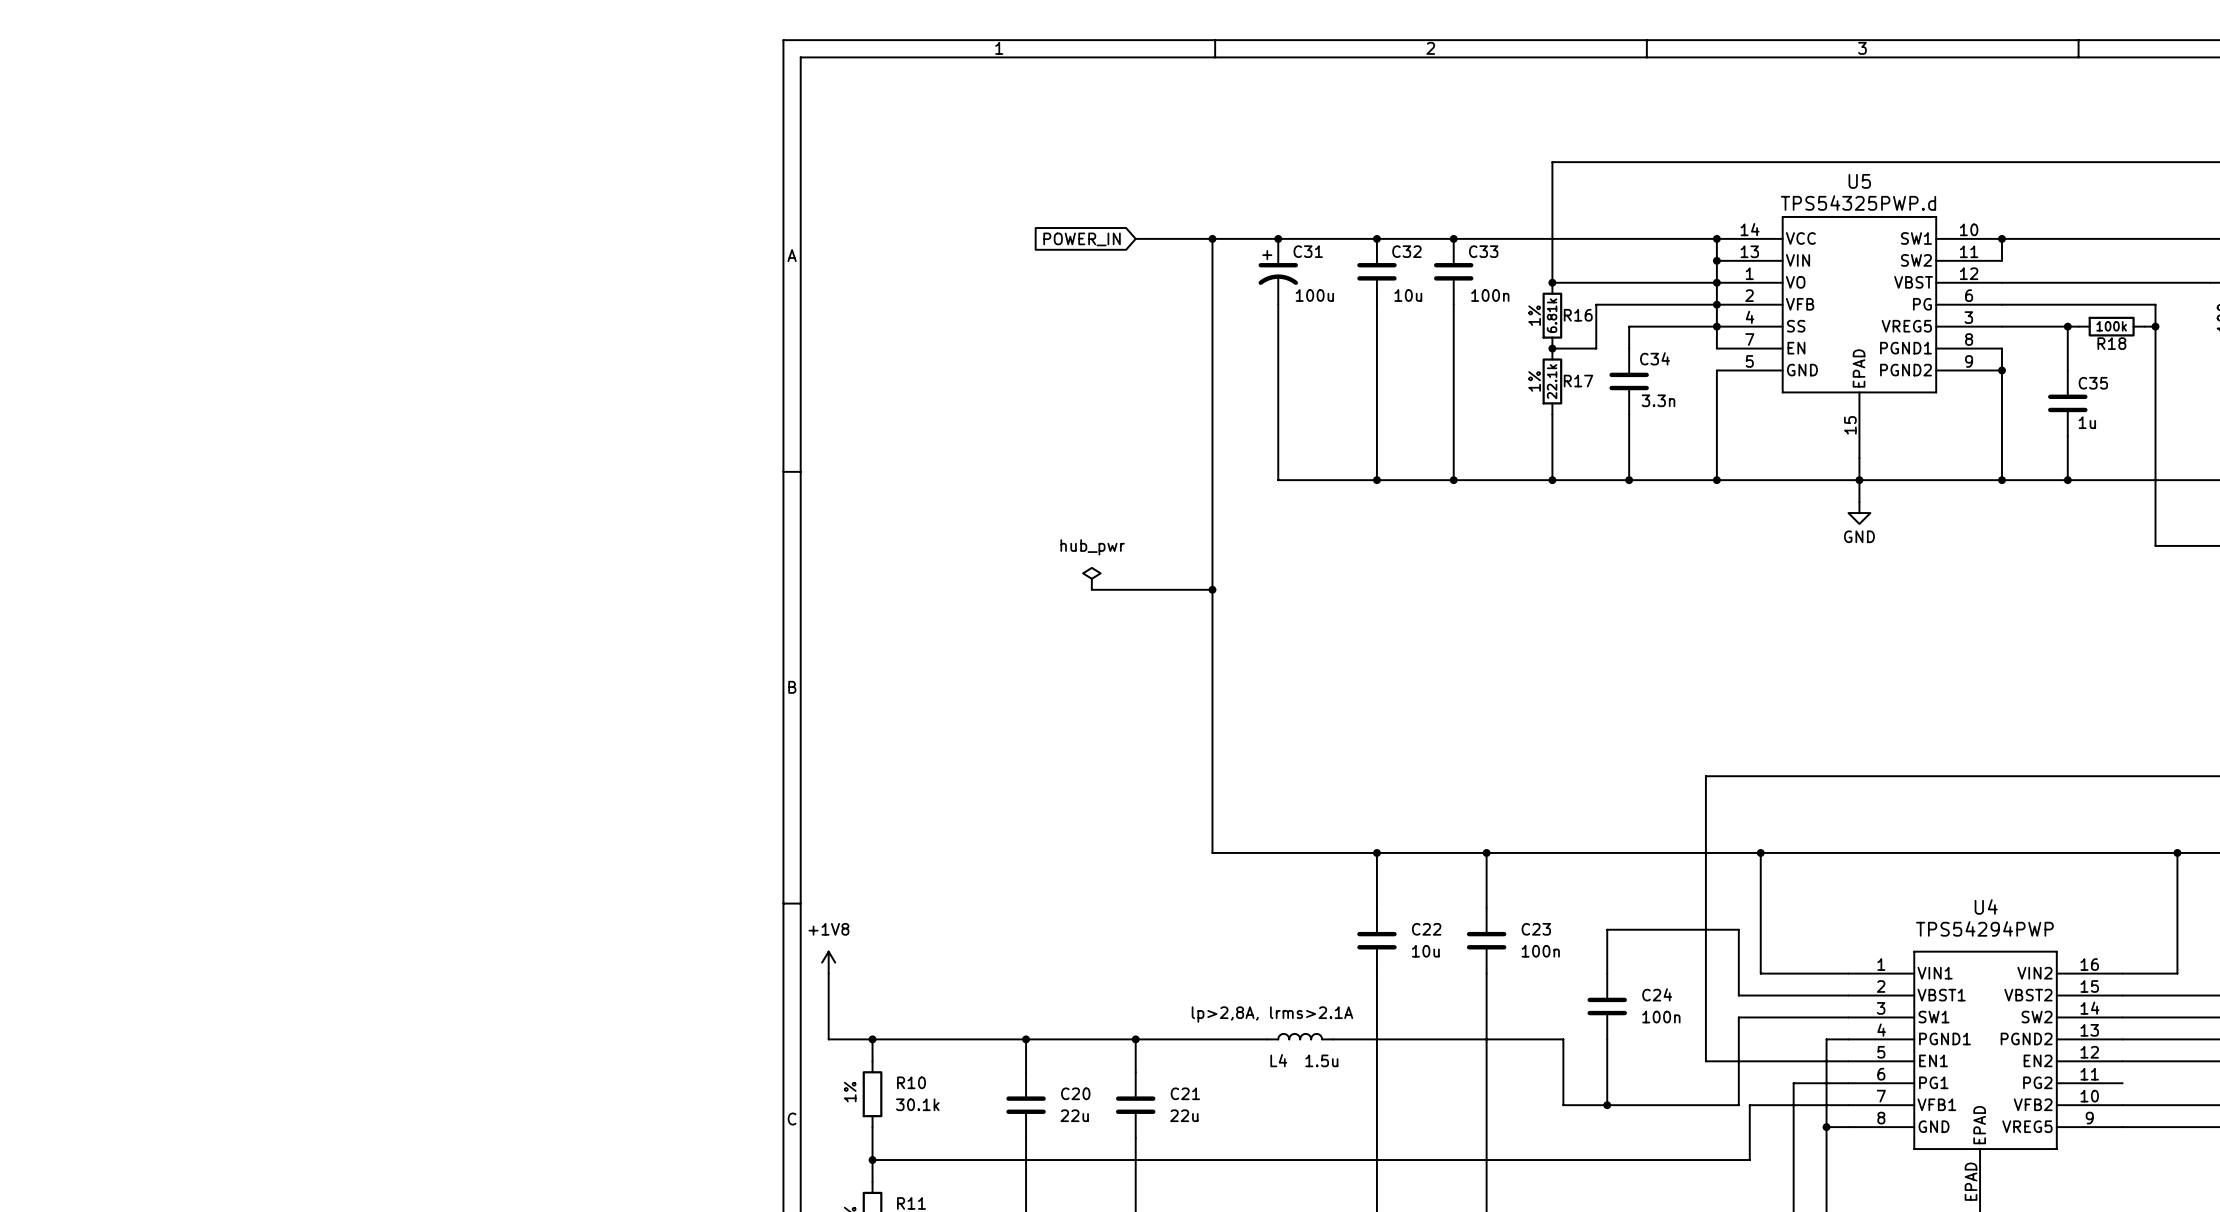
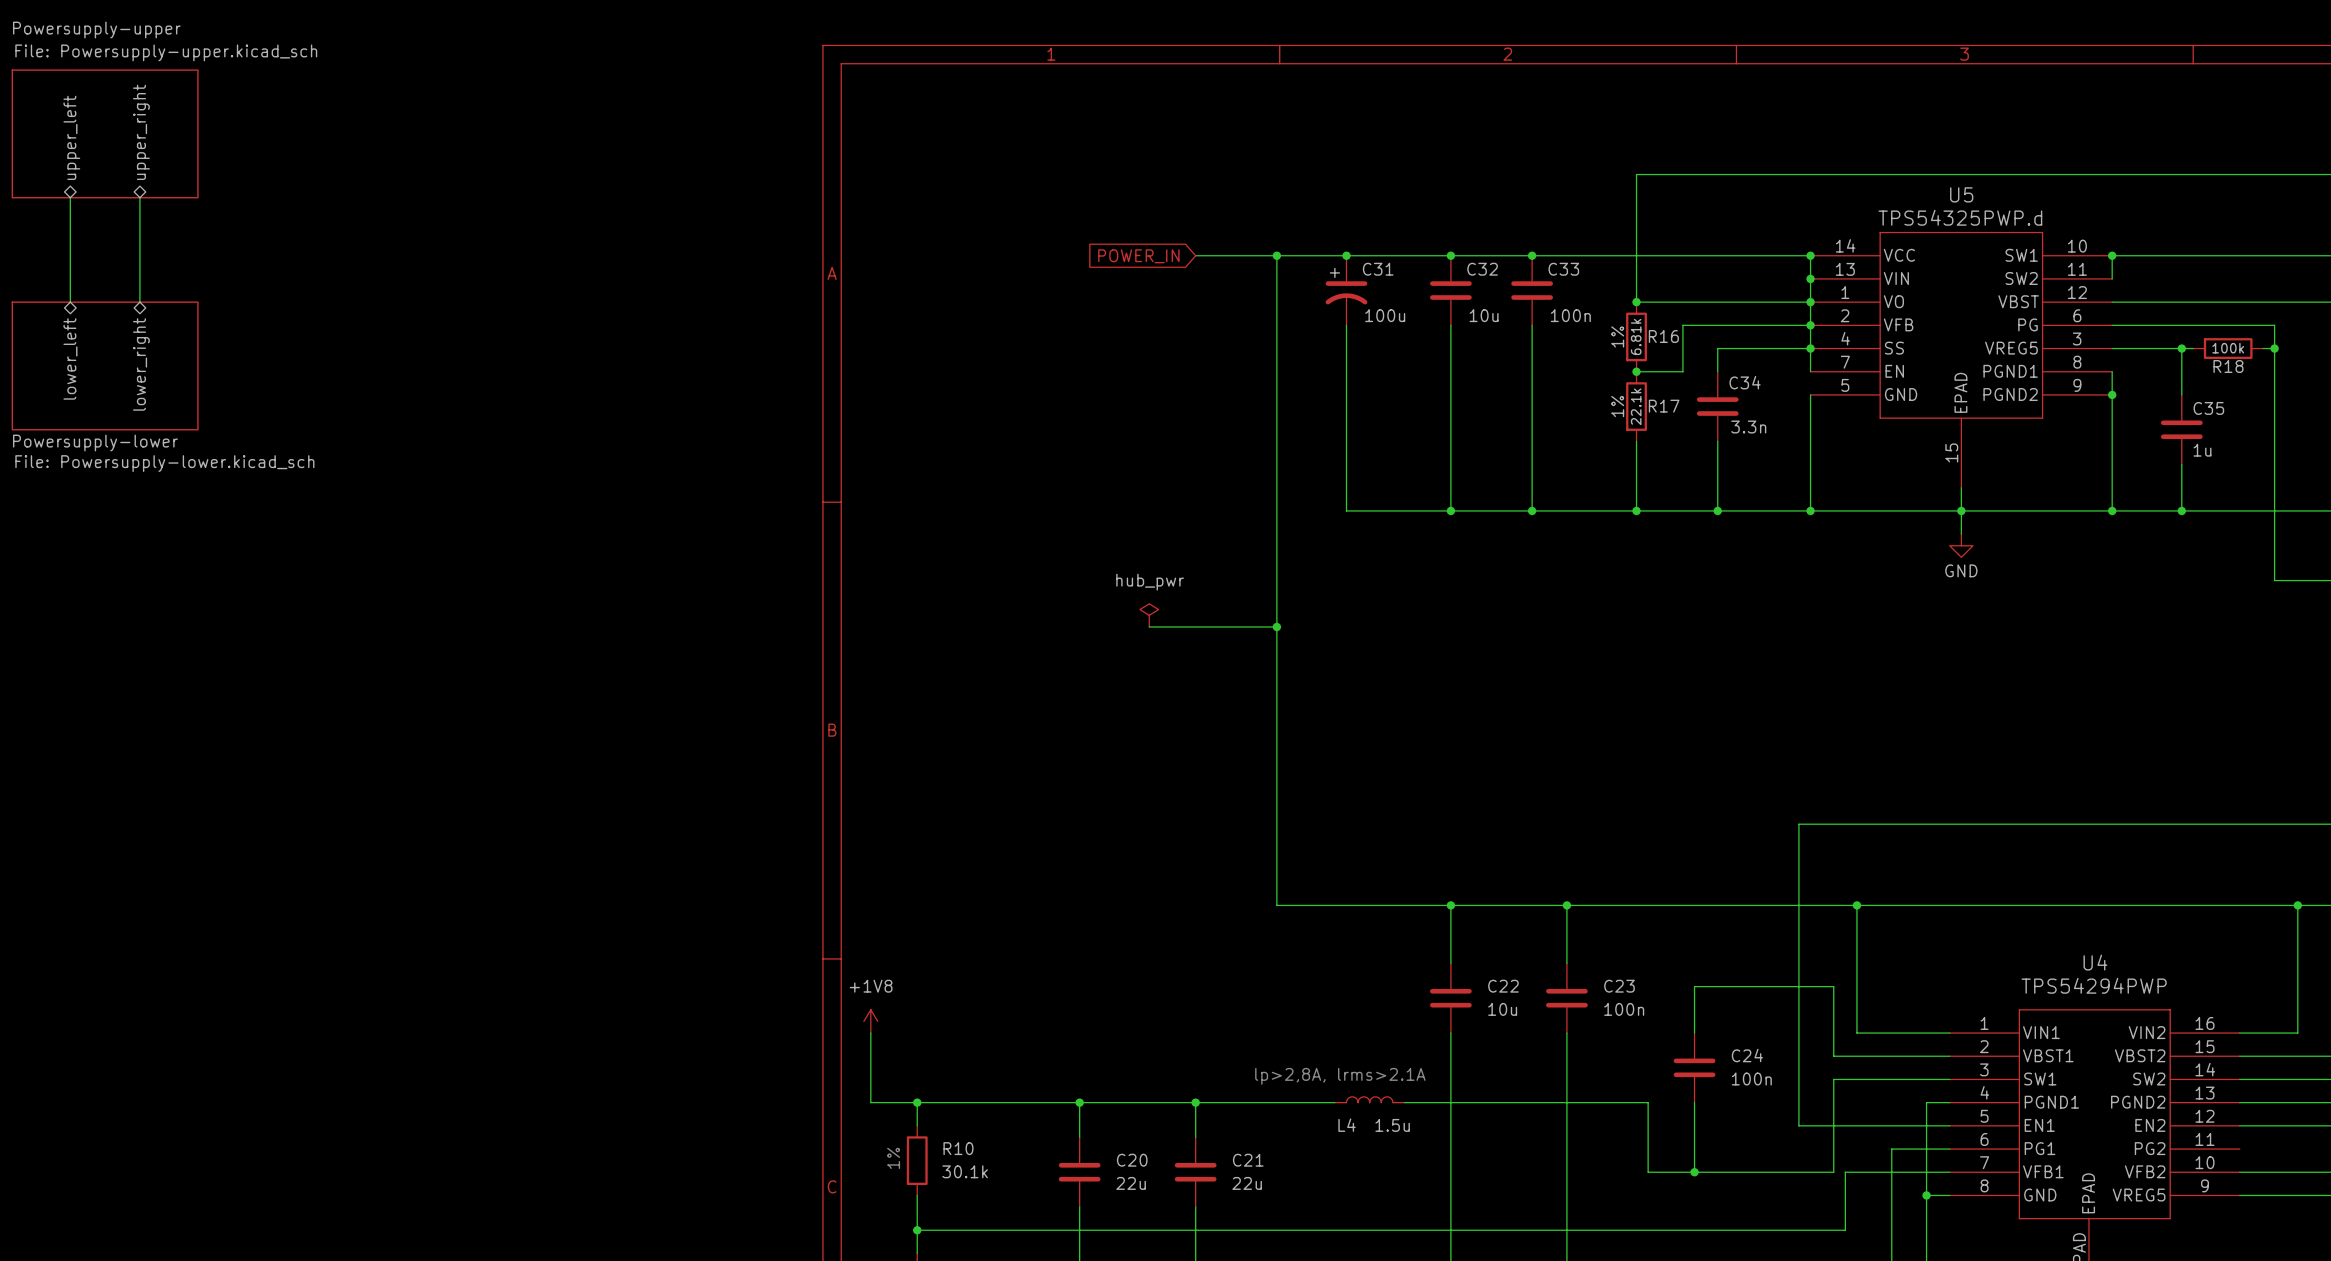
sheet pin: none -> upper_right (141, 132)
sheet Powersupply-upper: none -> File: Powersupply-upper.kicad_sch (105, 133)
sheet pin: none -> upper_left (71, 137)
wire: none -> (70, 197) (70, 302)
wire: none -> (139, 197) (139, 302)
sheet pin: none -> lower_left (70, 358)
sheet pin: none -> lower_right (141, 364)
sheet Powersupply-lower: none -> File: Powersupply-lower.kicad_sch (105, 365)

